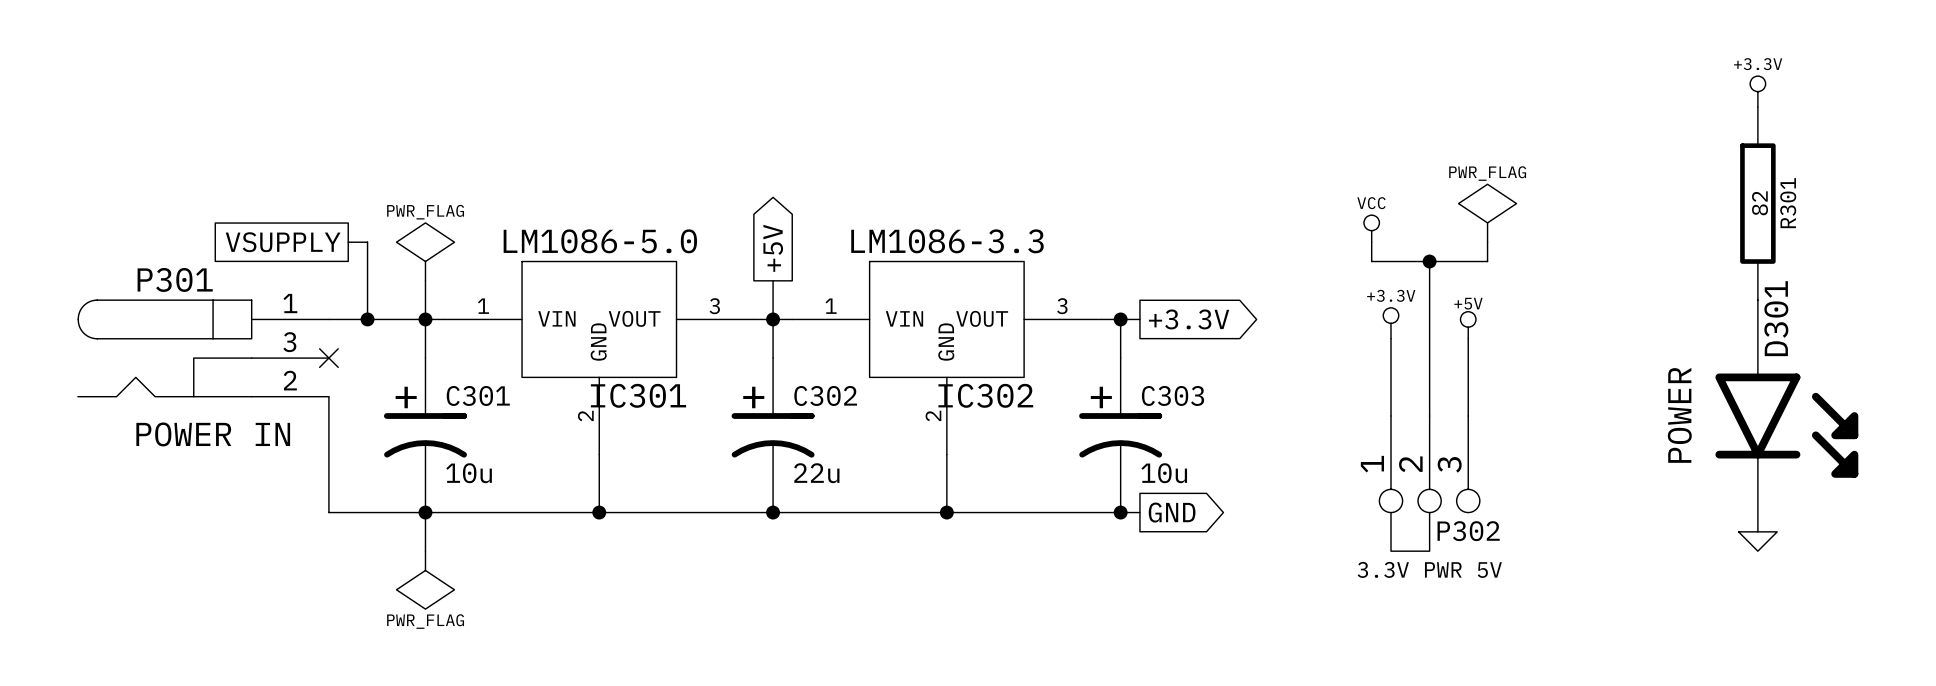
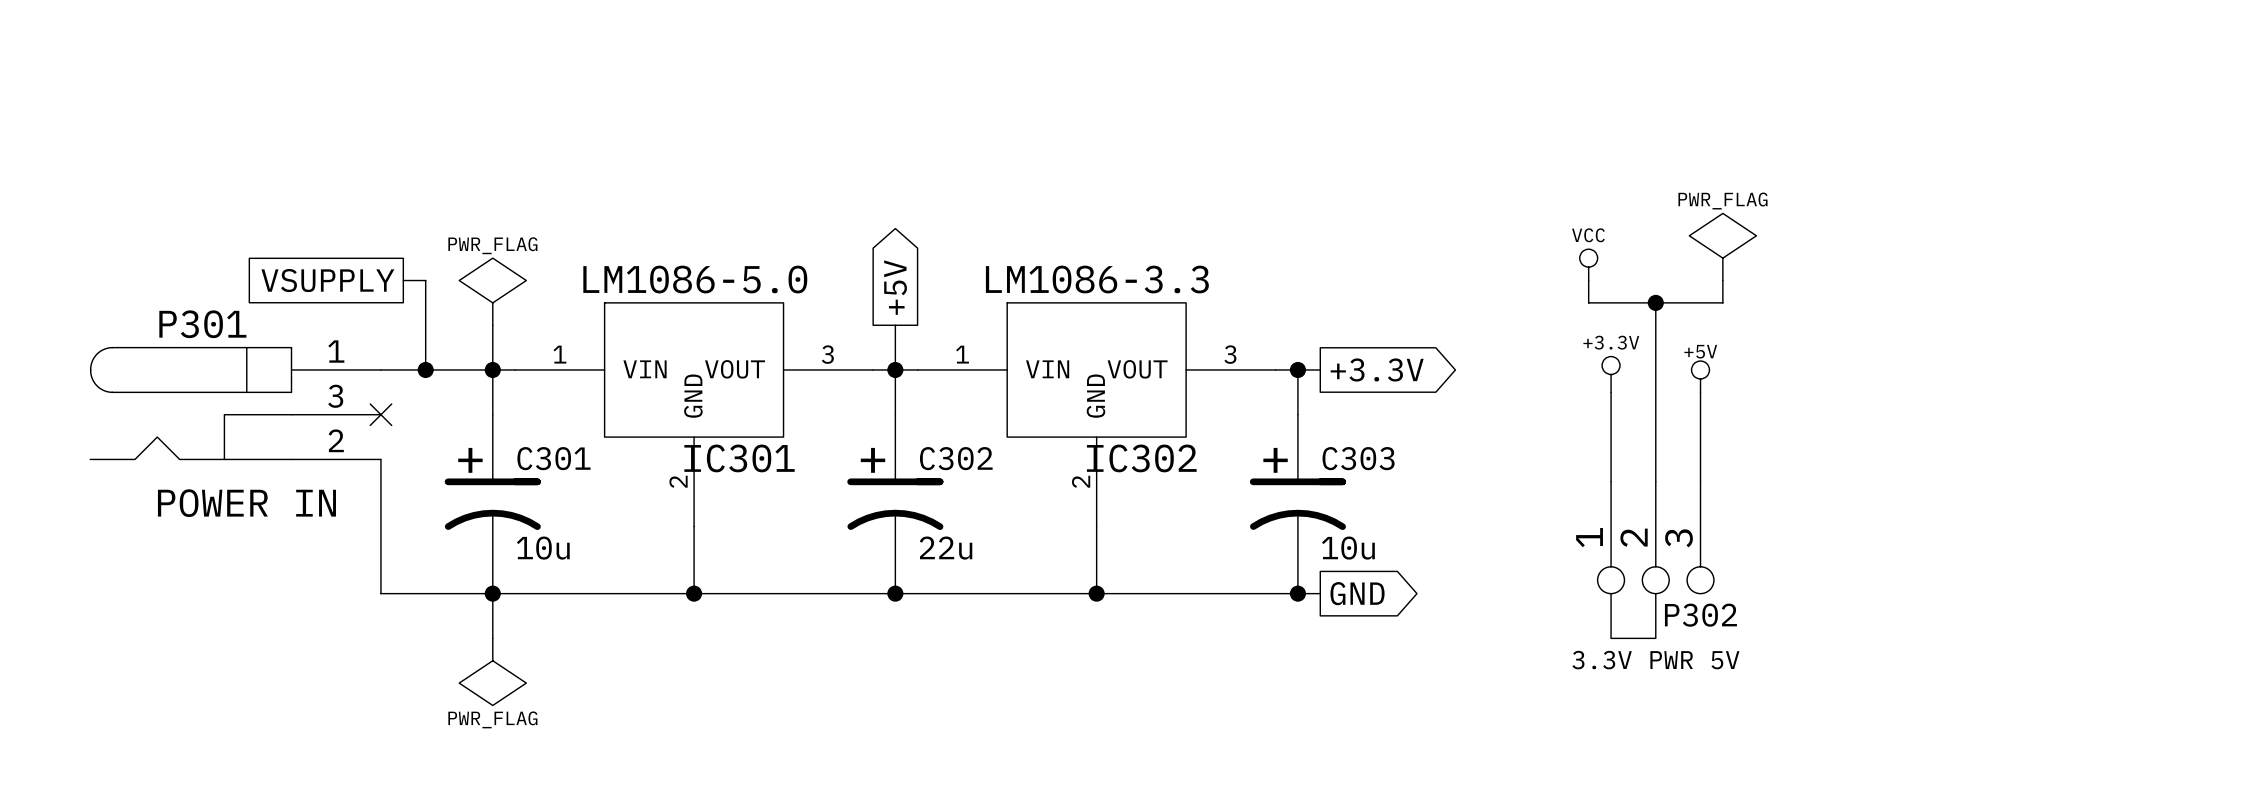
power symbol: +3.3V (1757, 91) -> none
R301: 82 (1757, 203) -> none
D301: POWER (1786, 416) -> none
power symbol: (1757, 541) -> none

